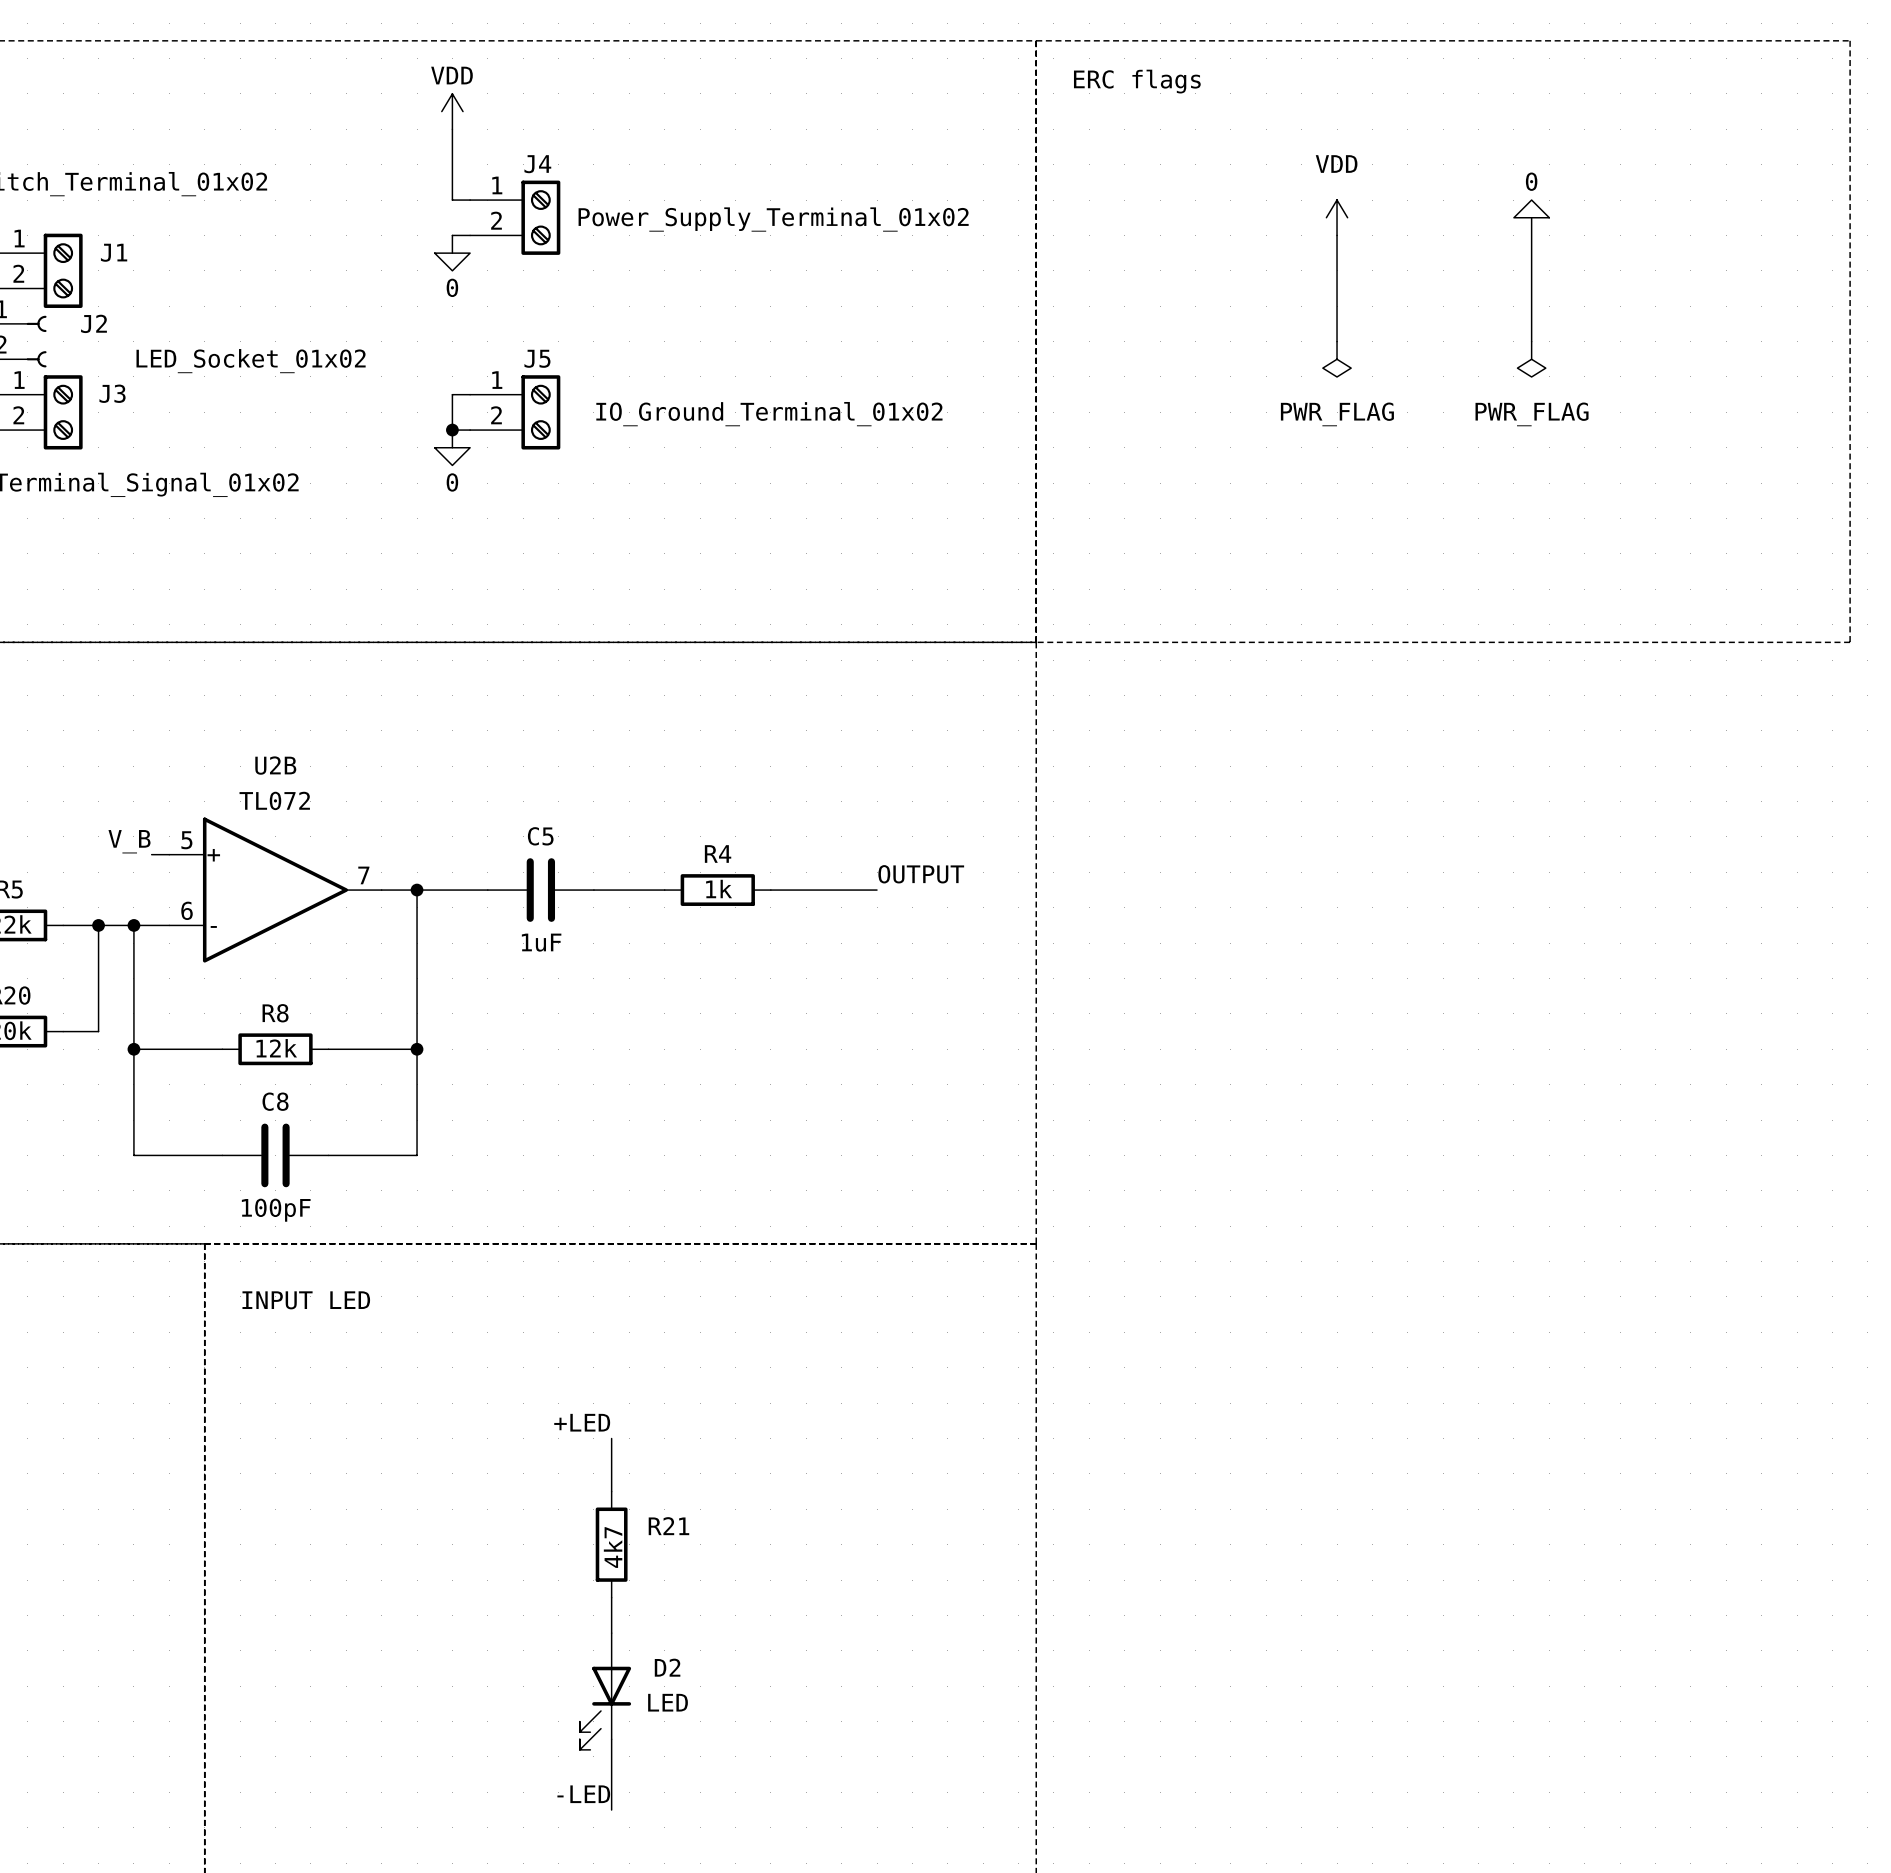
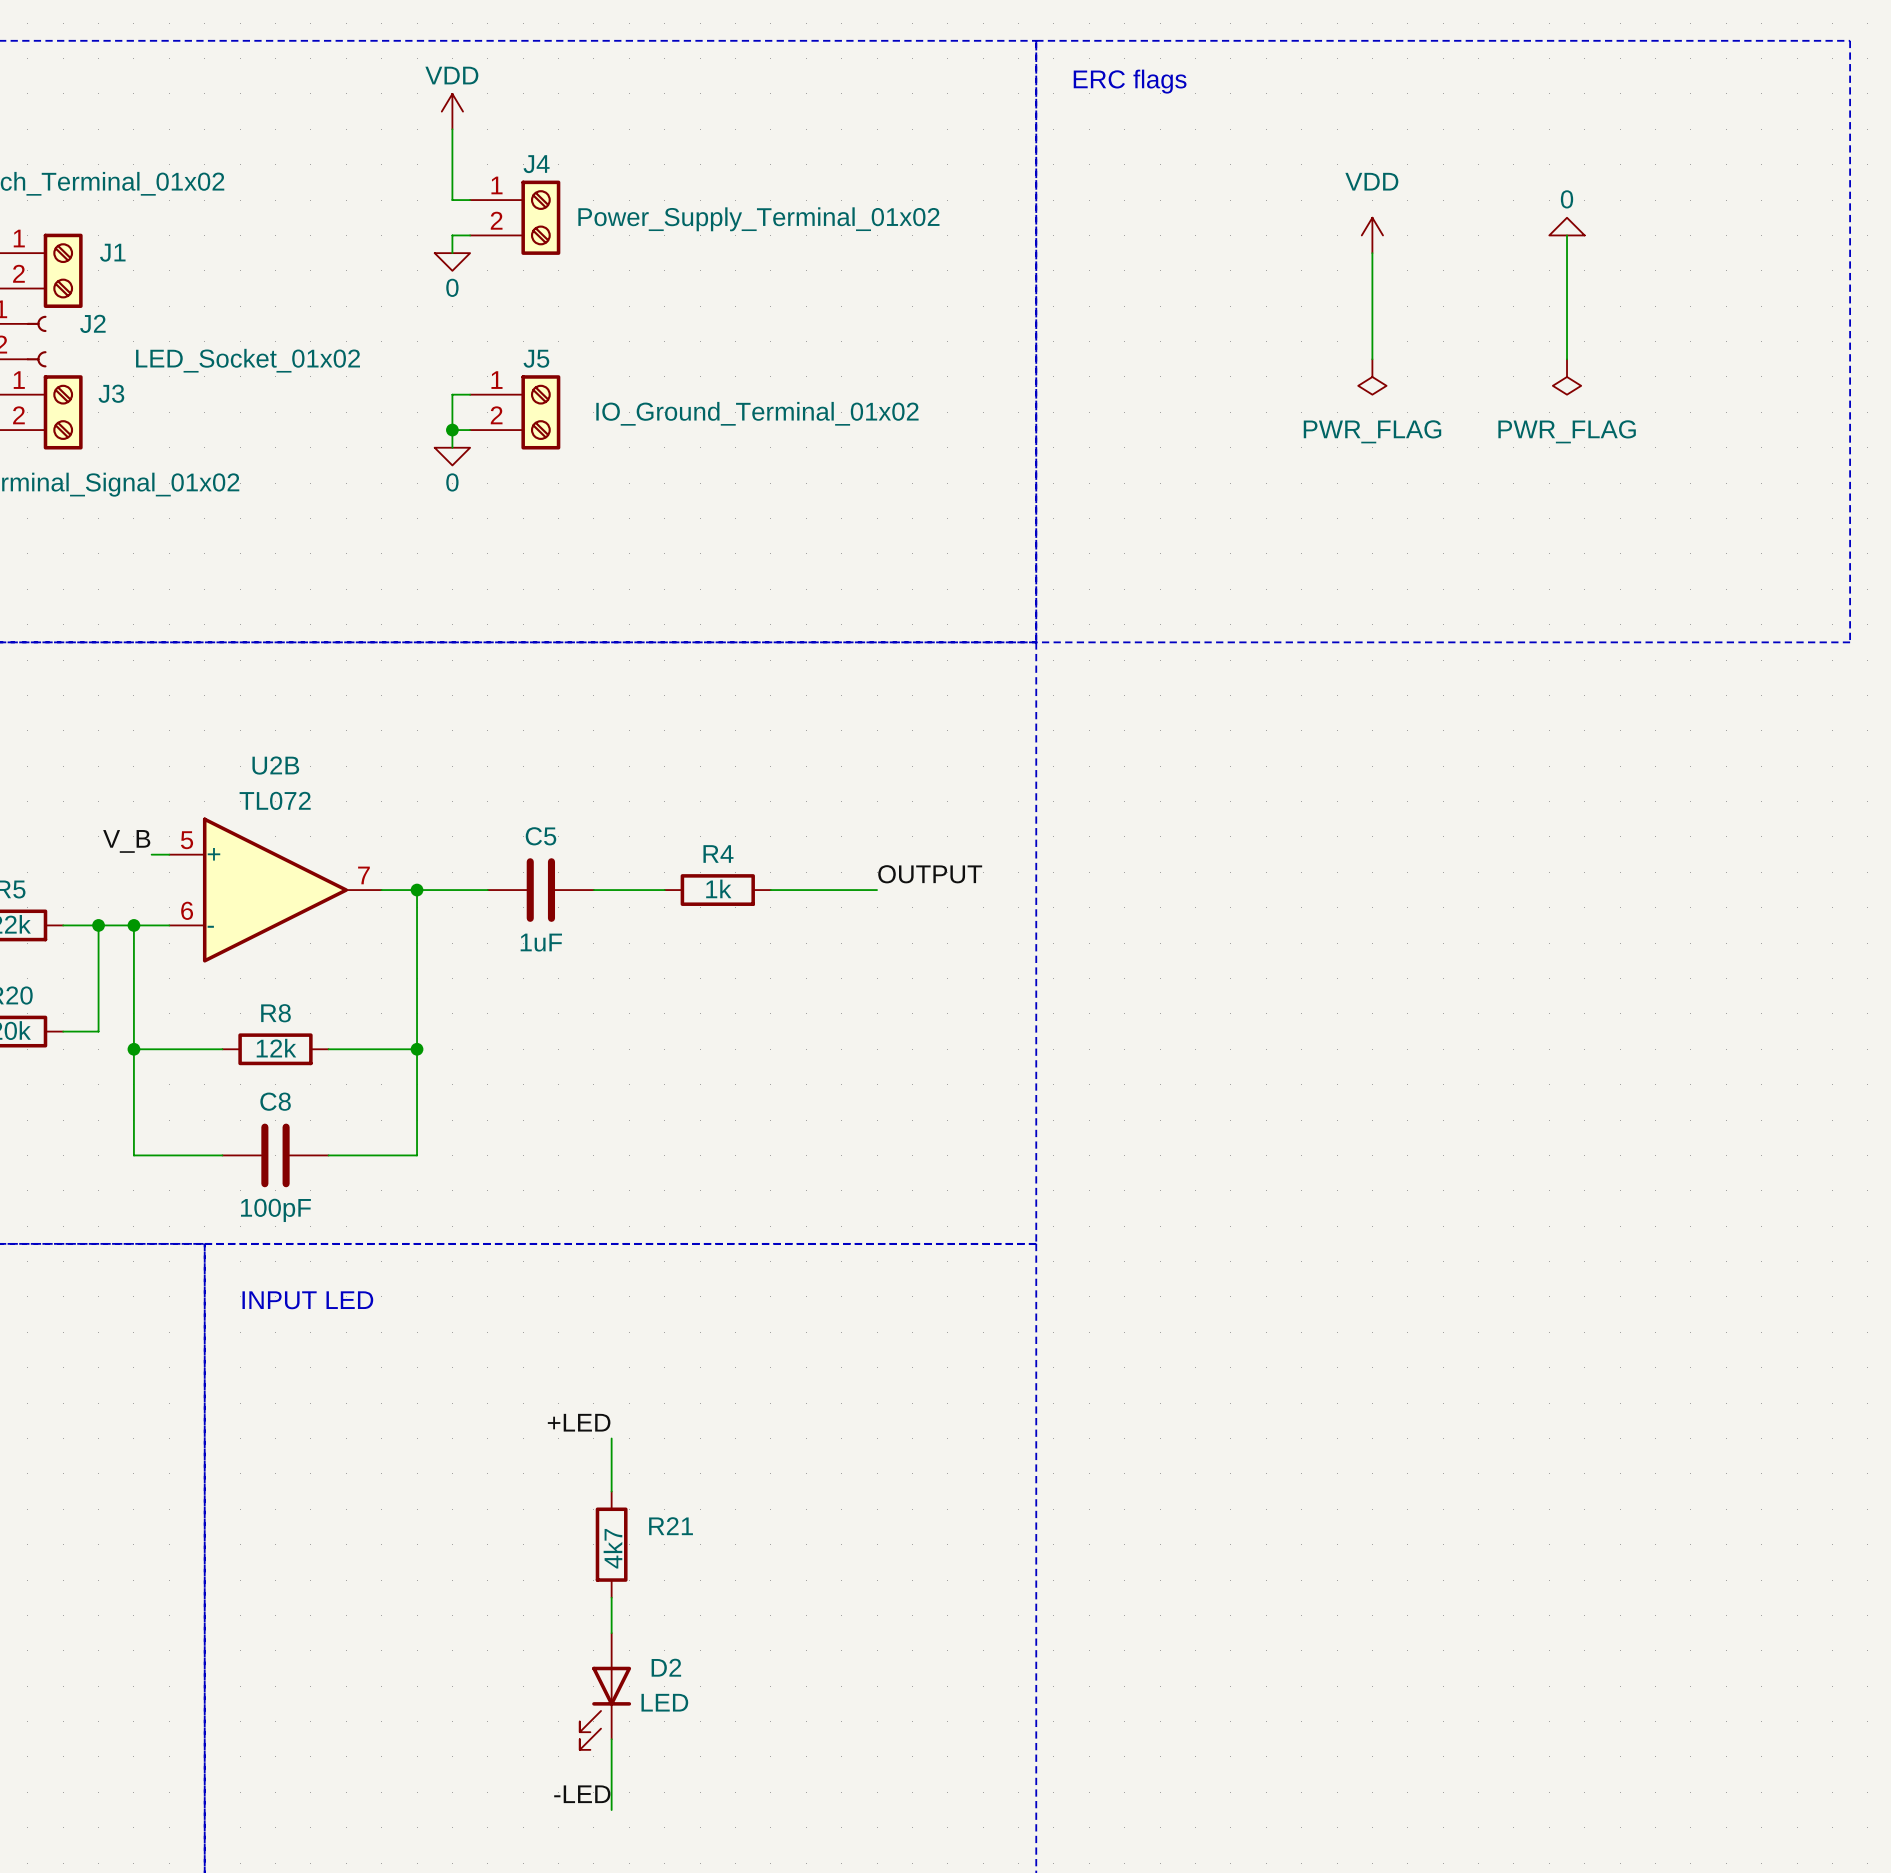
power symbol position: 0 (1531, 208) -> 0 (1567, 226)
power symbol position: VDD (1337, 217) -> VDD (1372, 235)
wire: (1531, 217) (1531, 341) -> (1567, 235) (1567, 359)
wire: (1337, 235) (1337, 341) -> (1372, 253) (1372, 359)
power symbol position: PWR_FLAG (1337, 359) -> PWR_FLAG (1372, 376)
power symbol position: PWR_FLAG (1531, 359) -> PWR_FLAG (1567, 376)

